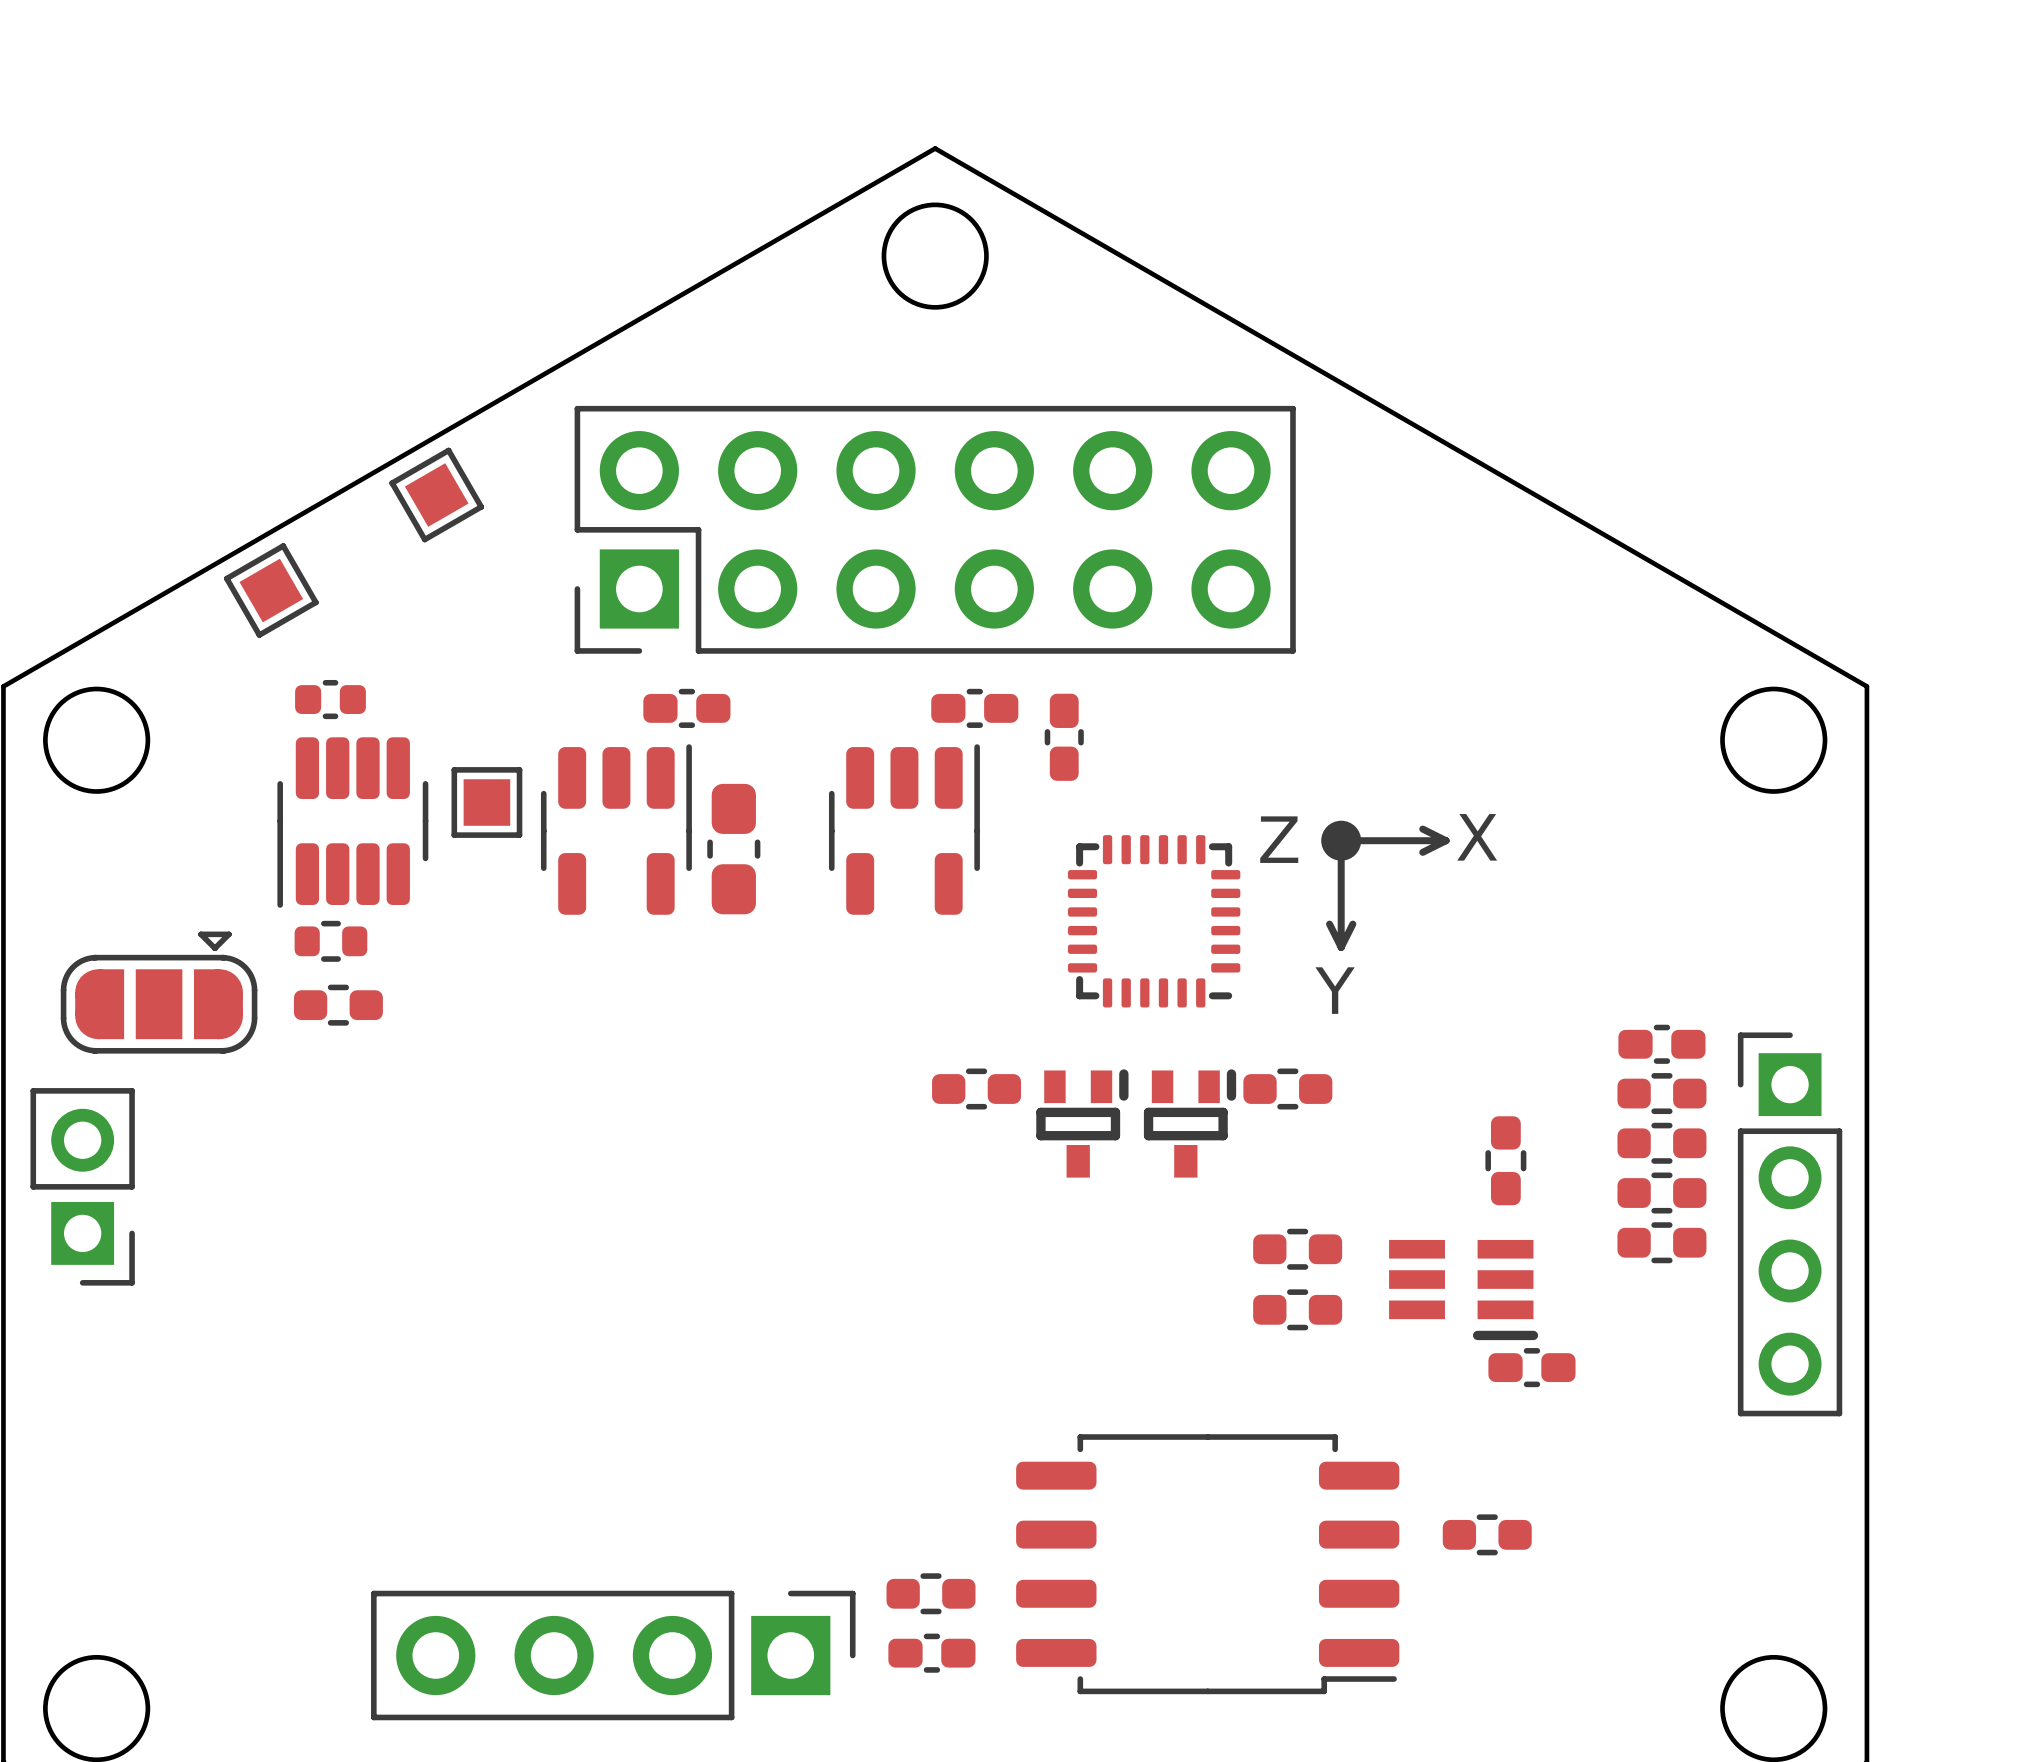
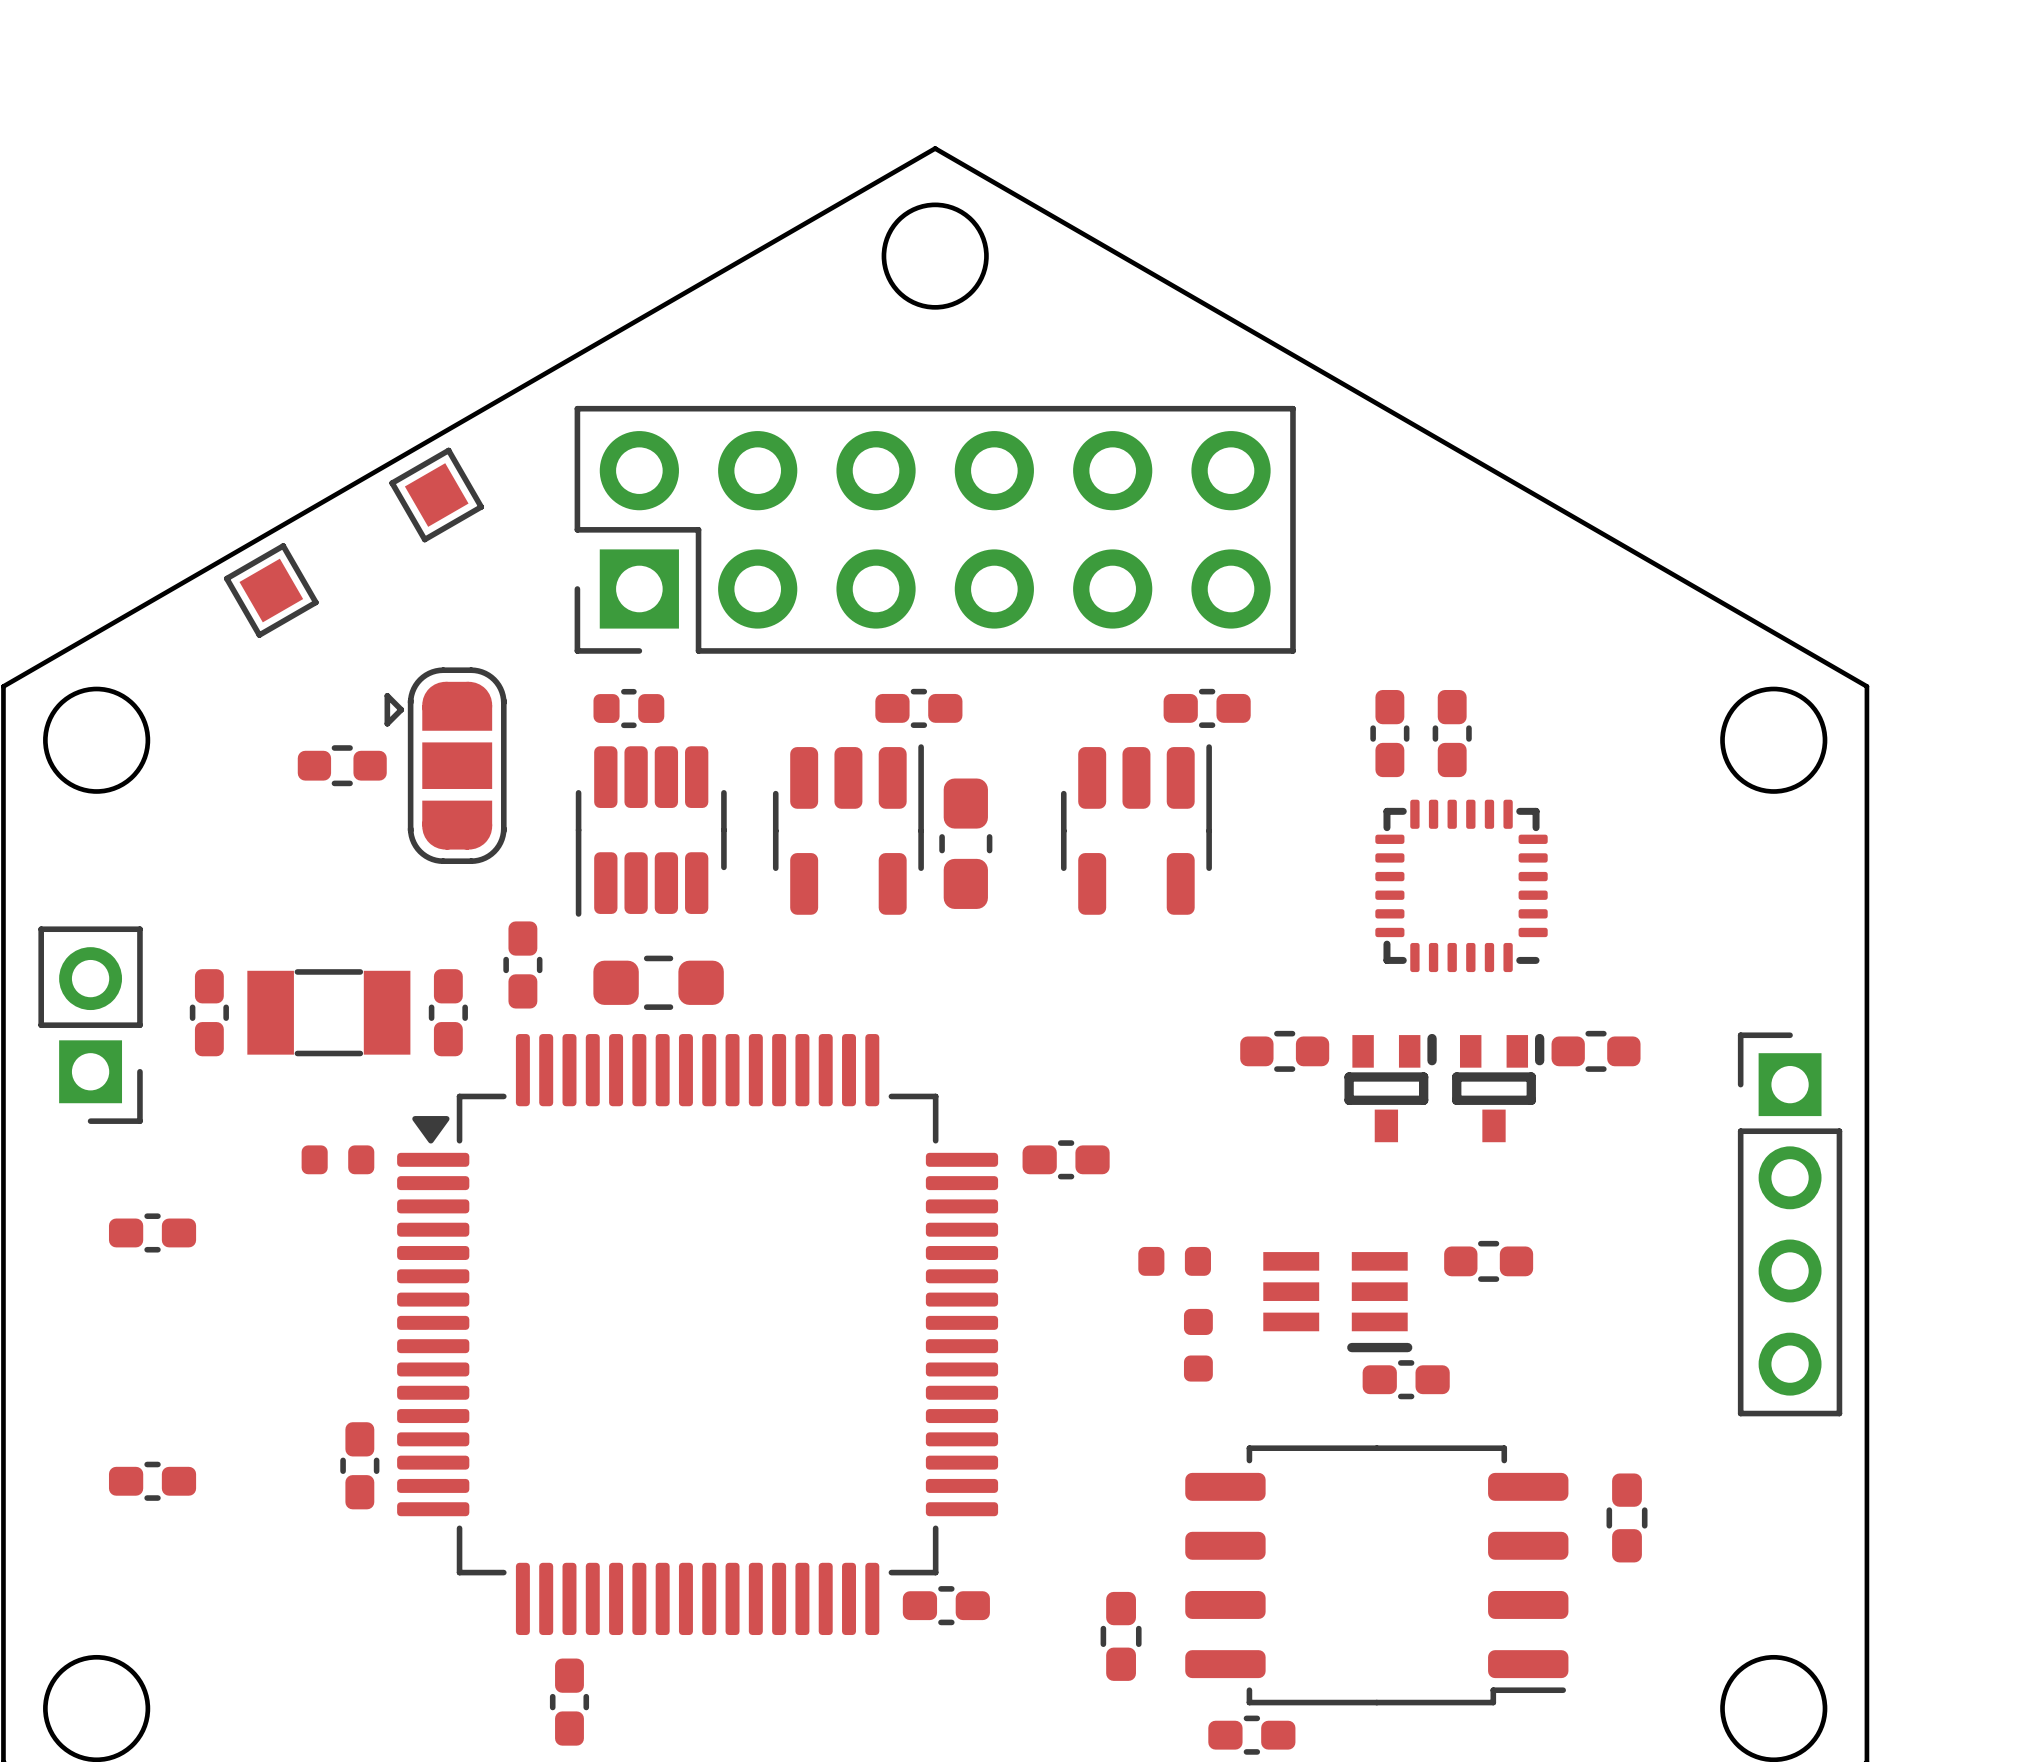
part position: (330, 699) -> (628, 708)
part: (686, 708) -> none
part position: (974, 708) -> (918, 708)
part: none -> (1207, 708)
part: none -> (1389, 733)
part: none -> (1452, 733)
part: (1064, 737) -> none
part footprint: [540, 744, 692, 915] -> [575, 746, 727, 917]
part: none -> (342, 765)
part: (486, 802) -> none
drawing: [1321, 820, 1362, 861] -> none
part: (352, 822) -> none
part position: (904, 829) -> (848, 829)
part: none -> (1136, 829)
line: (1422, 829) (1446, 840) -> none
text: X (1477, 837) -> none
text: Z (1279, 839) -> none
line: (1446, 840) (1422, 852) -> none
line: (1446, 840) (1341, 840) (1341, 947) -> none
part position: (733, 849) -> (965, 843)
part position: (1154, 921) -> (1461, 885)
line: (1329, 924) (1341, 947) -> none
line: (1352, 924) (1341, 947) -> none
part: (330, 941) -> none
part: none -> (522, 964)
part: none -> (658, 982)
part footprint: [293, 984, 383, 1026] -> [247, 969, 411, 1057]
text: Y (1335, 990) -> none
part rotation: 0° (159, 992) -> 90° counterclockwise (445, 765)
part position: (159, 992) -> (445, 765)
part: none -> (209, 1012)
part: none -> (448, 1012)
part: (1661, 1044) -> none
part: none -> (1596, 1051)
part footprint: [1036, 1069, 1129, 1178] -> [1022, 1140, 1110, 1180]
part: none -> (1390, 1088)
part: none -> (1498, 1088)
part: (976, 1089) -> none
part position: (1287, 1089) -> (1284, 1051)
part: (1661, 1093) -> none
part: (1190, 1123) -> none
part: (1661, 1143) -> none
part: none -> (337, 1159)
part: (1505, 1160) -> none
part position: (82, 1186) -> (90, 1025)
part: (1661, 1193) -> none
part: none -> (152, 1232)
part footprint: [1389, 1239, 1539, 1341] -> [1444, 1240, 1534, 1282]
part: (1661, 1242) -> none
part: (1297, 1249) -> none
part: none -> (1174, 1261)
part: none -> (1337, 1302)
part: (1297, 1309) -> none
part: none -> (697, 1334)
part: none -> (1198, 1345)
part position: (1531, 1367) -> (1406, 1379)
part: none -> (359, 1465)
part: none -> (152, 1481)
part: none -> (1627, 1517)
part: (1487, 1534) -> none
part position: (1207, 1564) -> (1376, 1575)
part footprint: [886, 1573, 976, 1615] -> [902, 1586, 990, 1626]
part: none -> (1121, 1636)
part: (931, 1653) -> none
part: (613, 1655) -> none
part: none -> (569, 1702)
part: none -> (1251, 1735)

